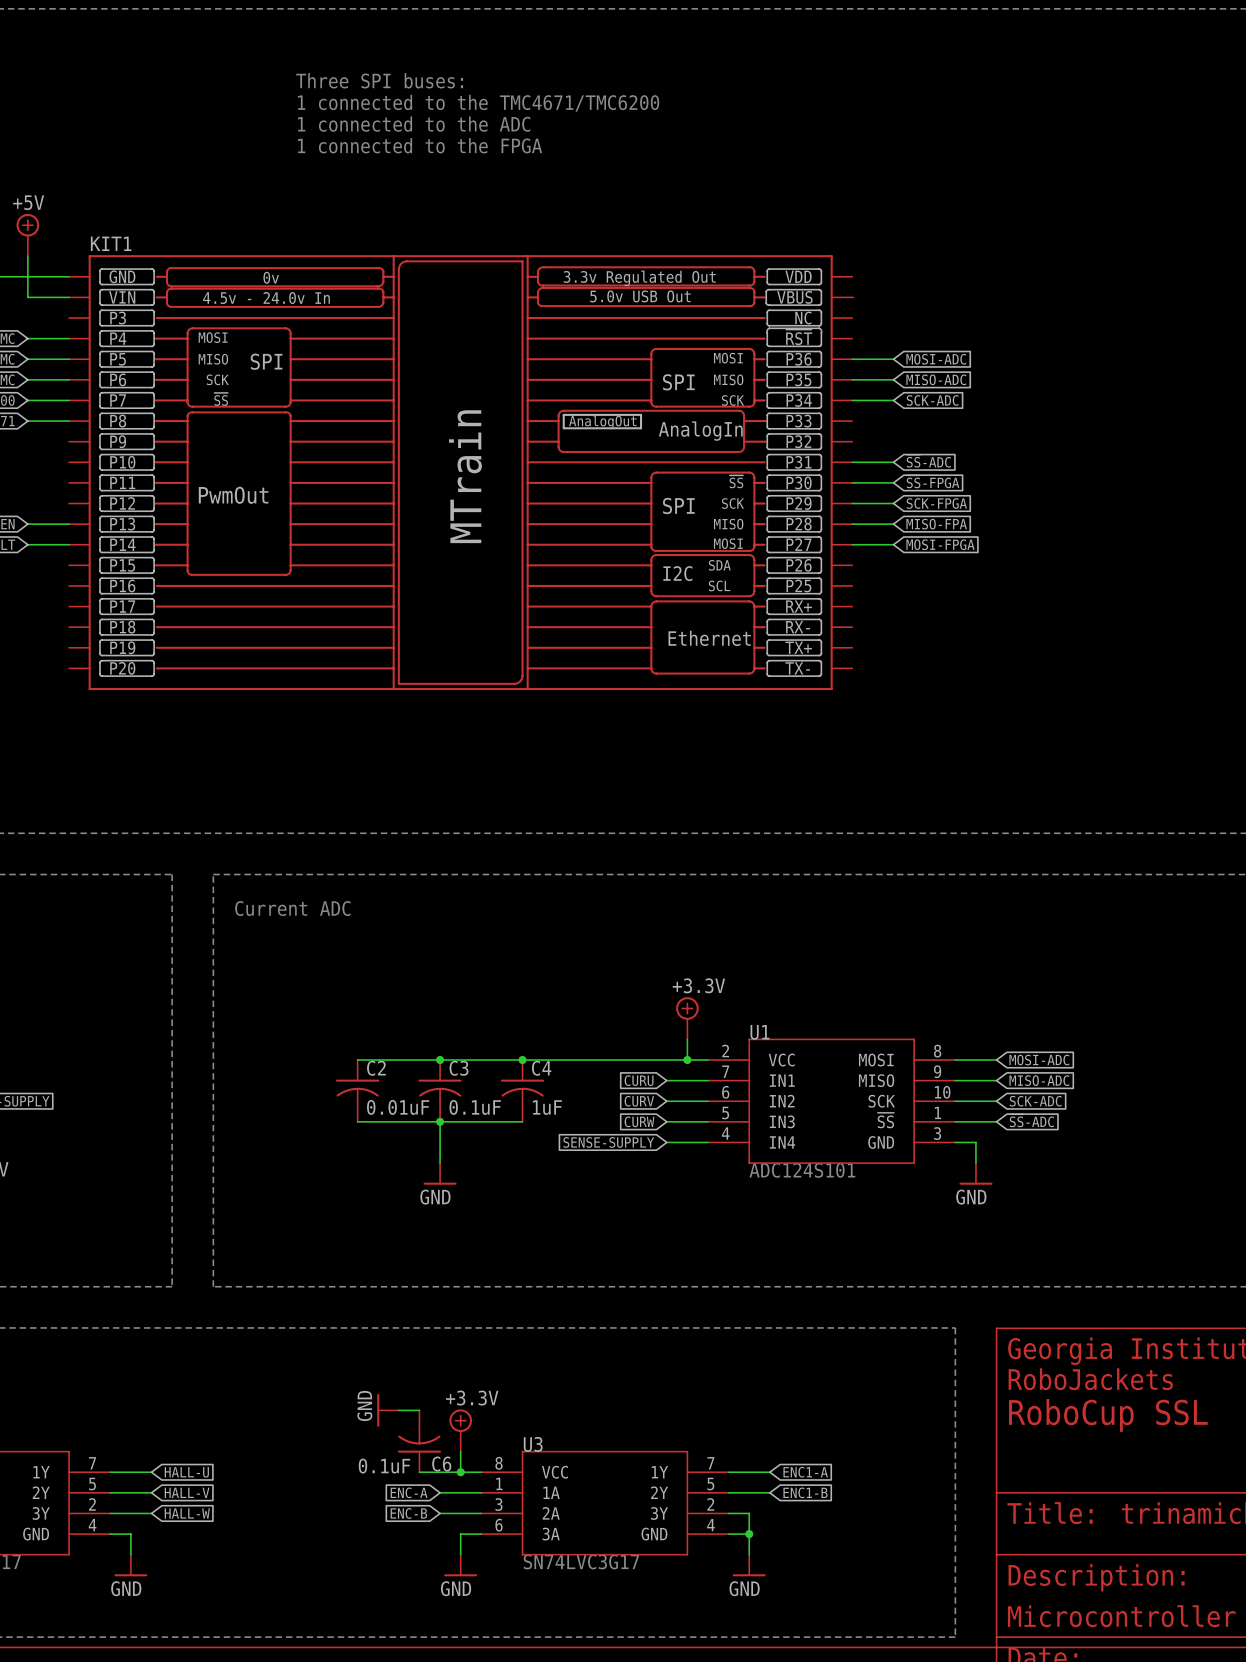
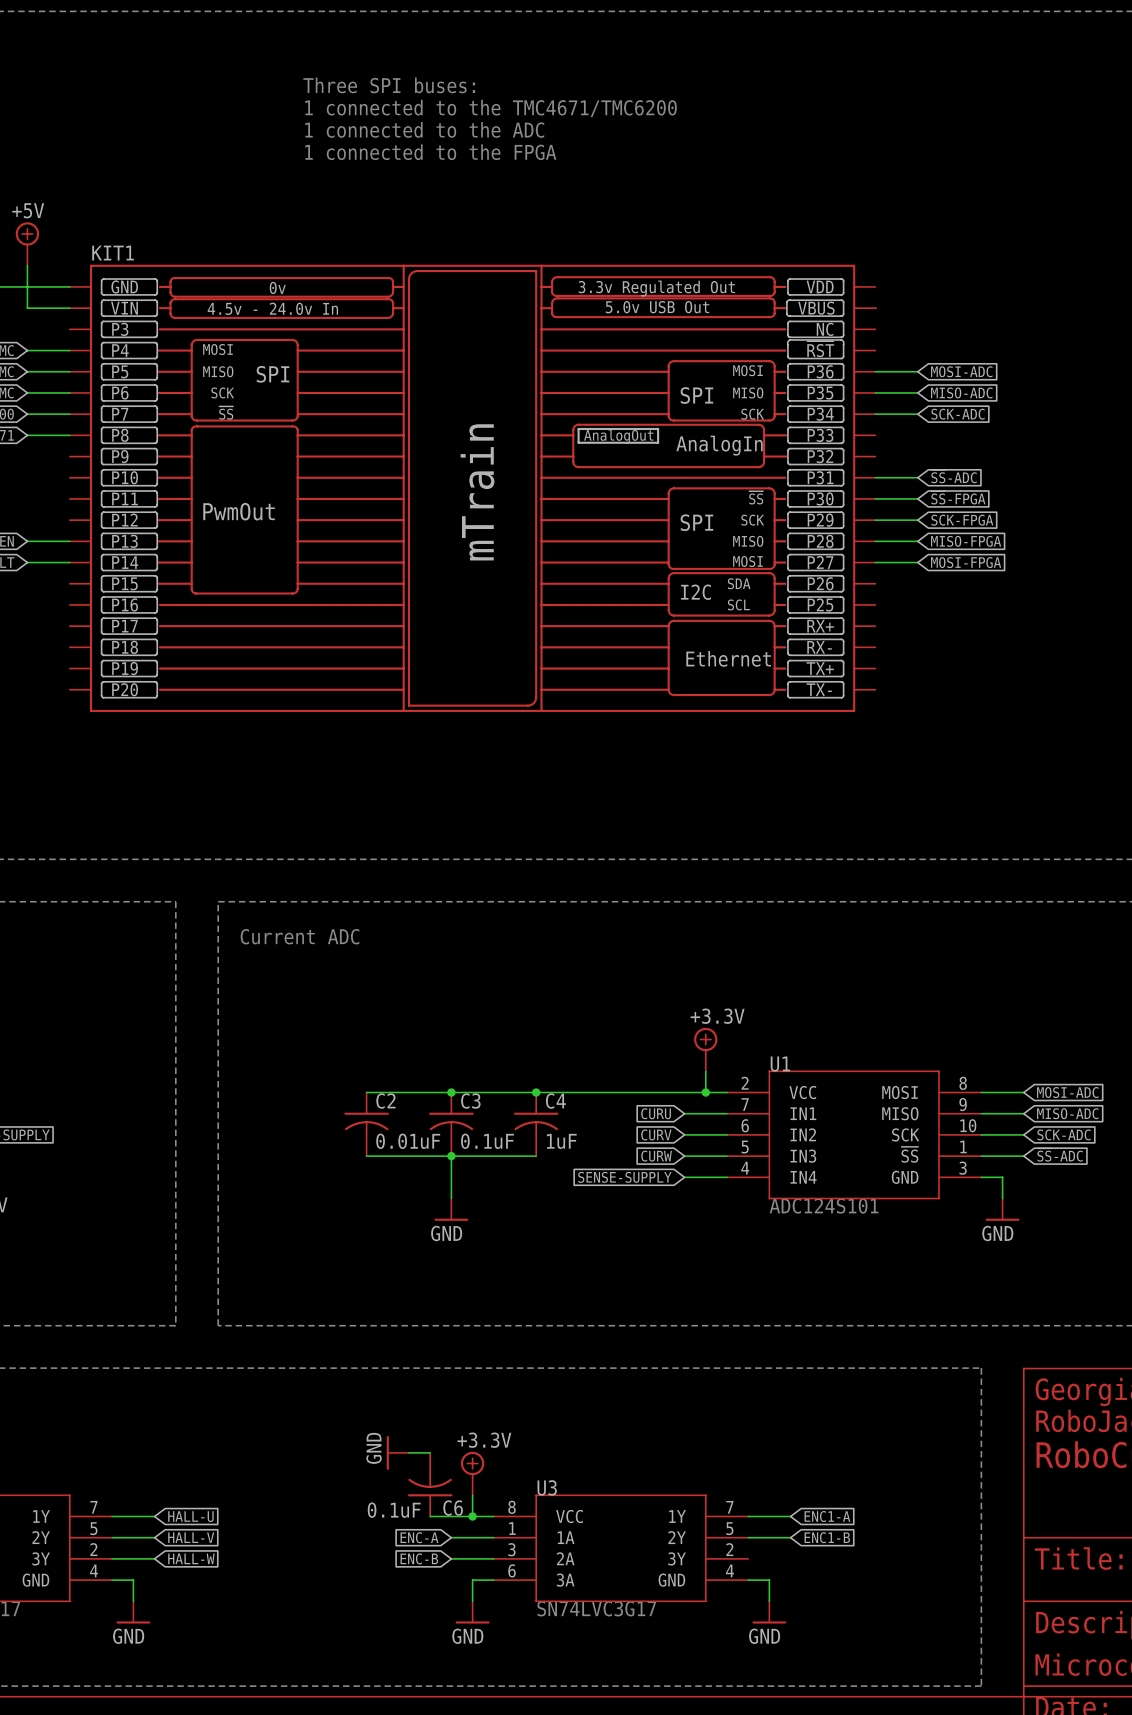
KIT1 text: MTrain (465, 476) -> mTrain (477, 492)
global label: MISO-FPA (936, 524) -> MISO-FPGA (966, 541)
wire: (728, 1513) (749, 1513) (749, 1534) -> none
junction: (749, 1534) -> none

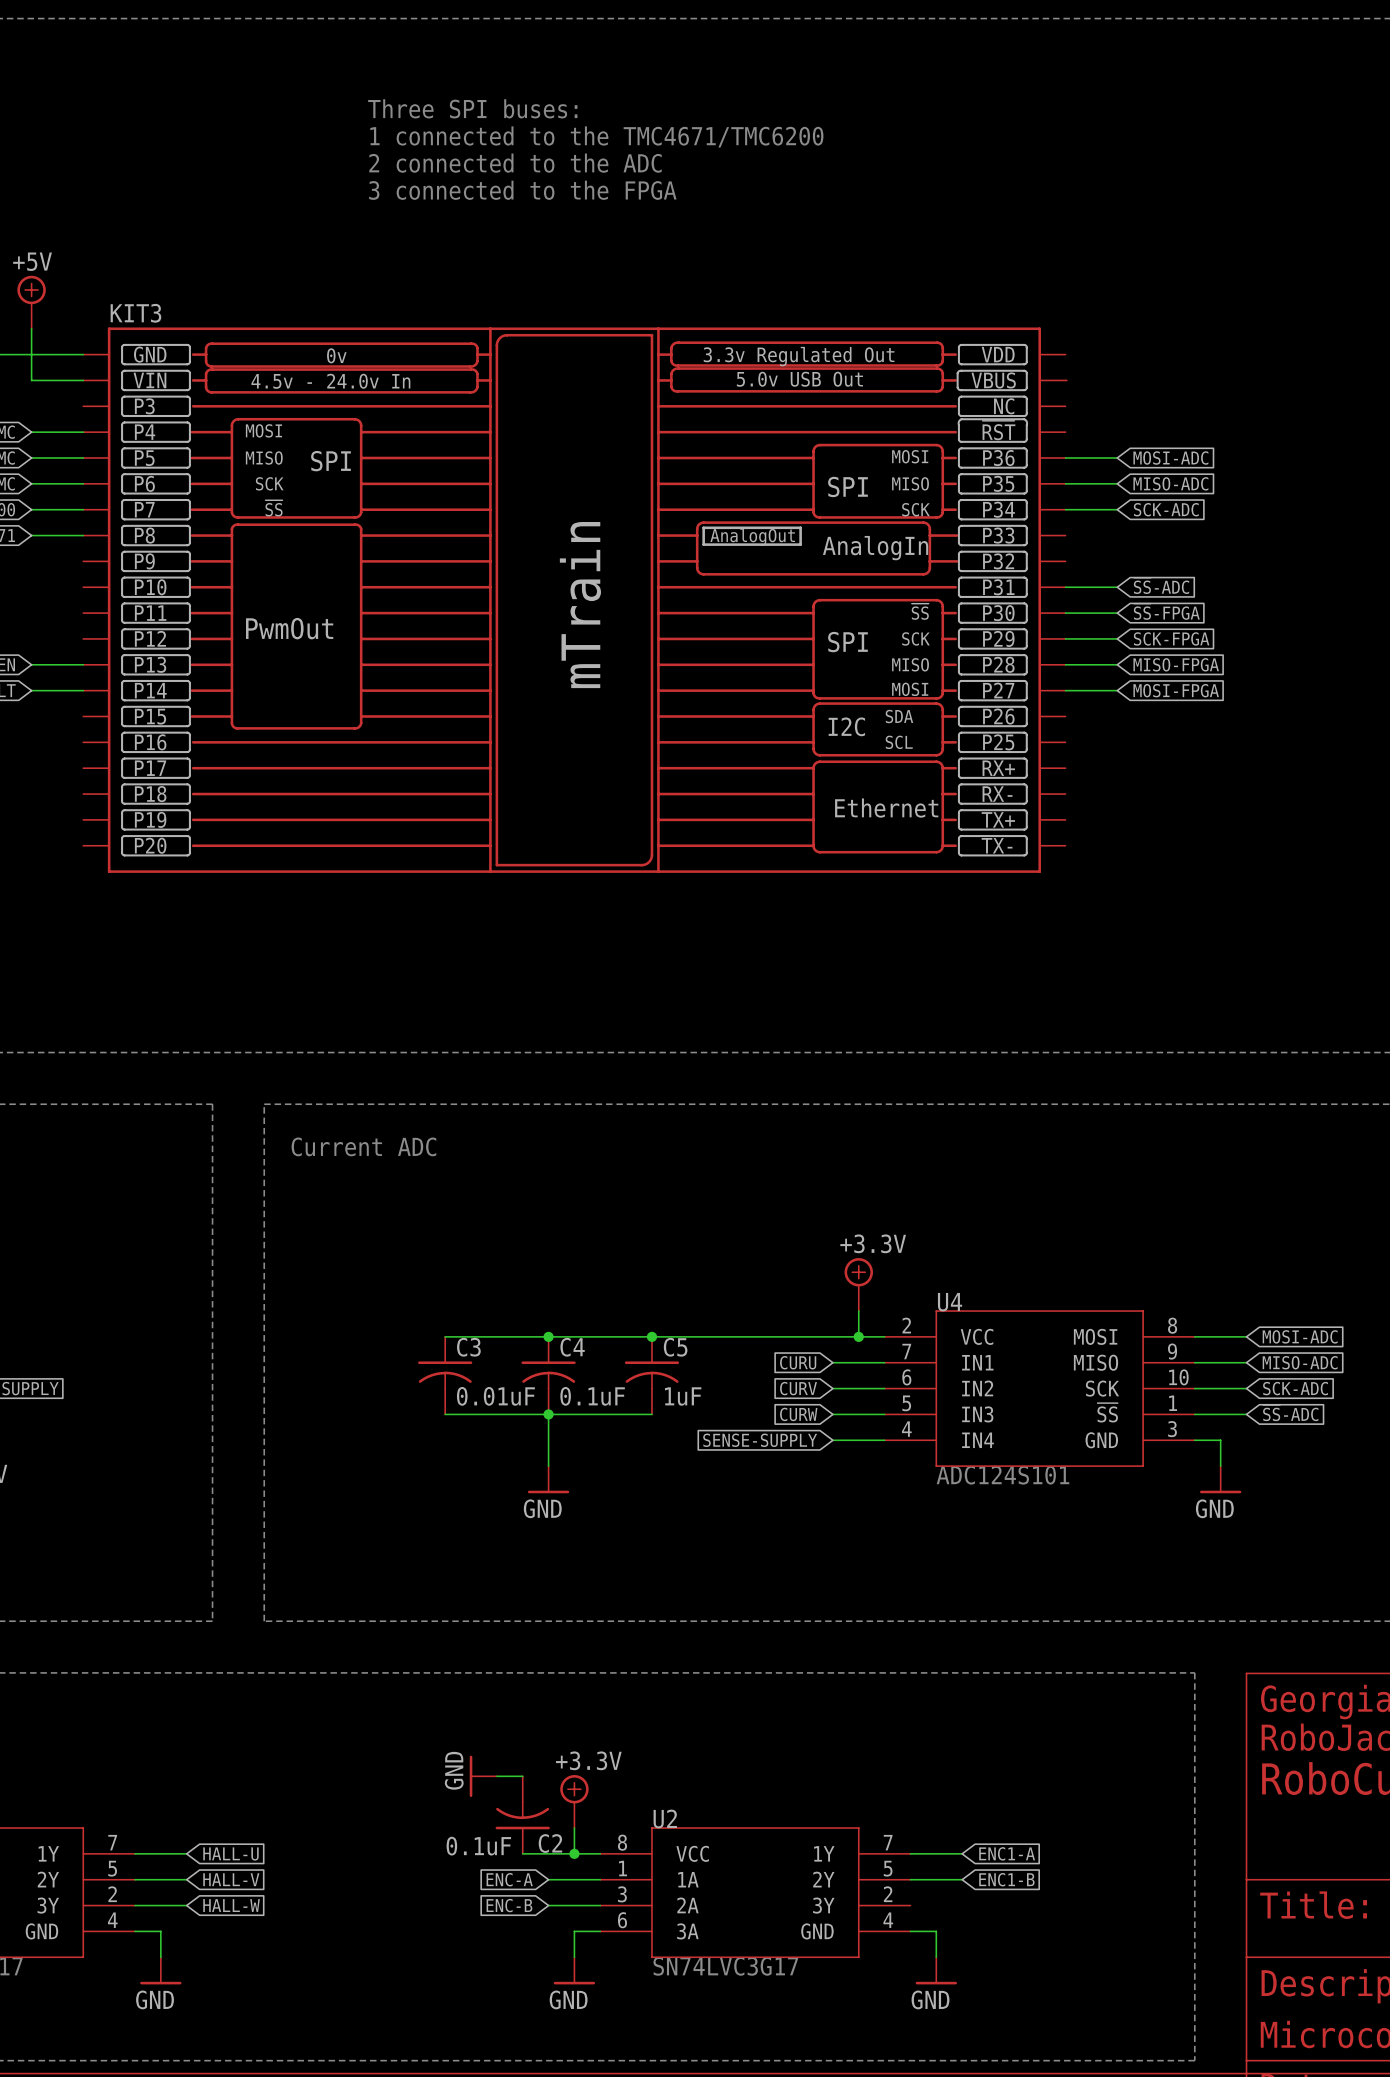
text: 1 connected to the ADC (424, 129) -> 2 connected to the ADC (515, 163)
text: 1 connected to the FPGA (430, 152) -> 3 connected to the FPGA (522, 190)
KIT1 name: KIT1 (113, 253) -> KIT3 (135, 313)
U1 name: U1 (780, 1064) -> U4 (950, 1302)
C2 name: C2 (385, 1101) -> C3 (468, 1347)
C3 name: C3 (470, 1101) -> C4 (572, 1347)
C4 name: C4 (555, 1101) -> C5 (675, 1347)
U3 name: U3 (547, 1487) -> U2 (665, 1818)
C6 name: C6 (453, 1508) -> C2 (550, 1843)

